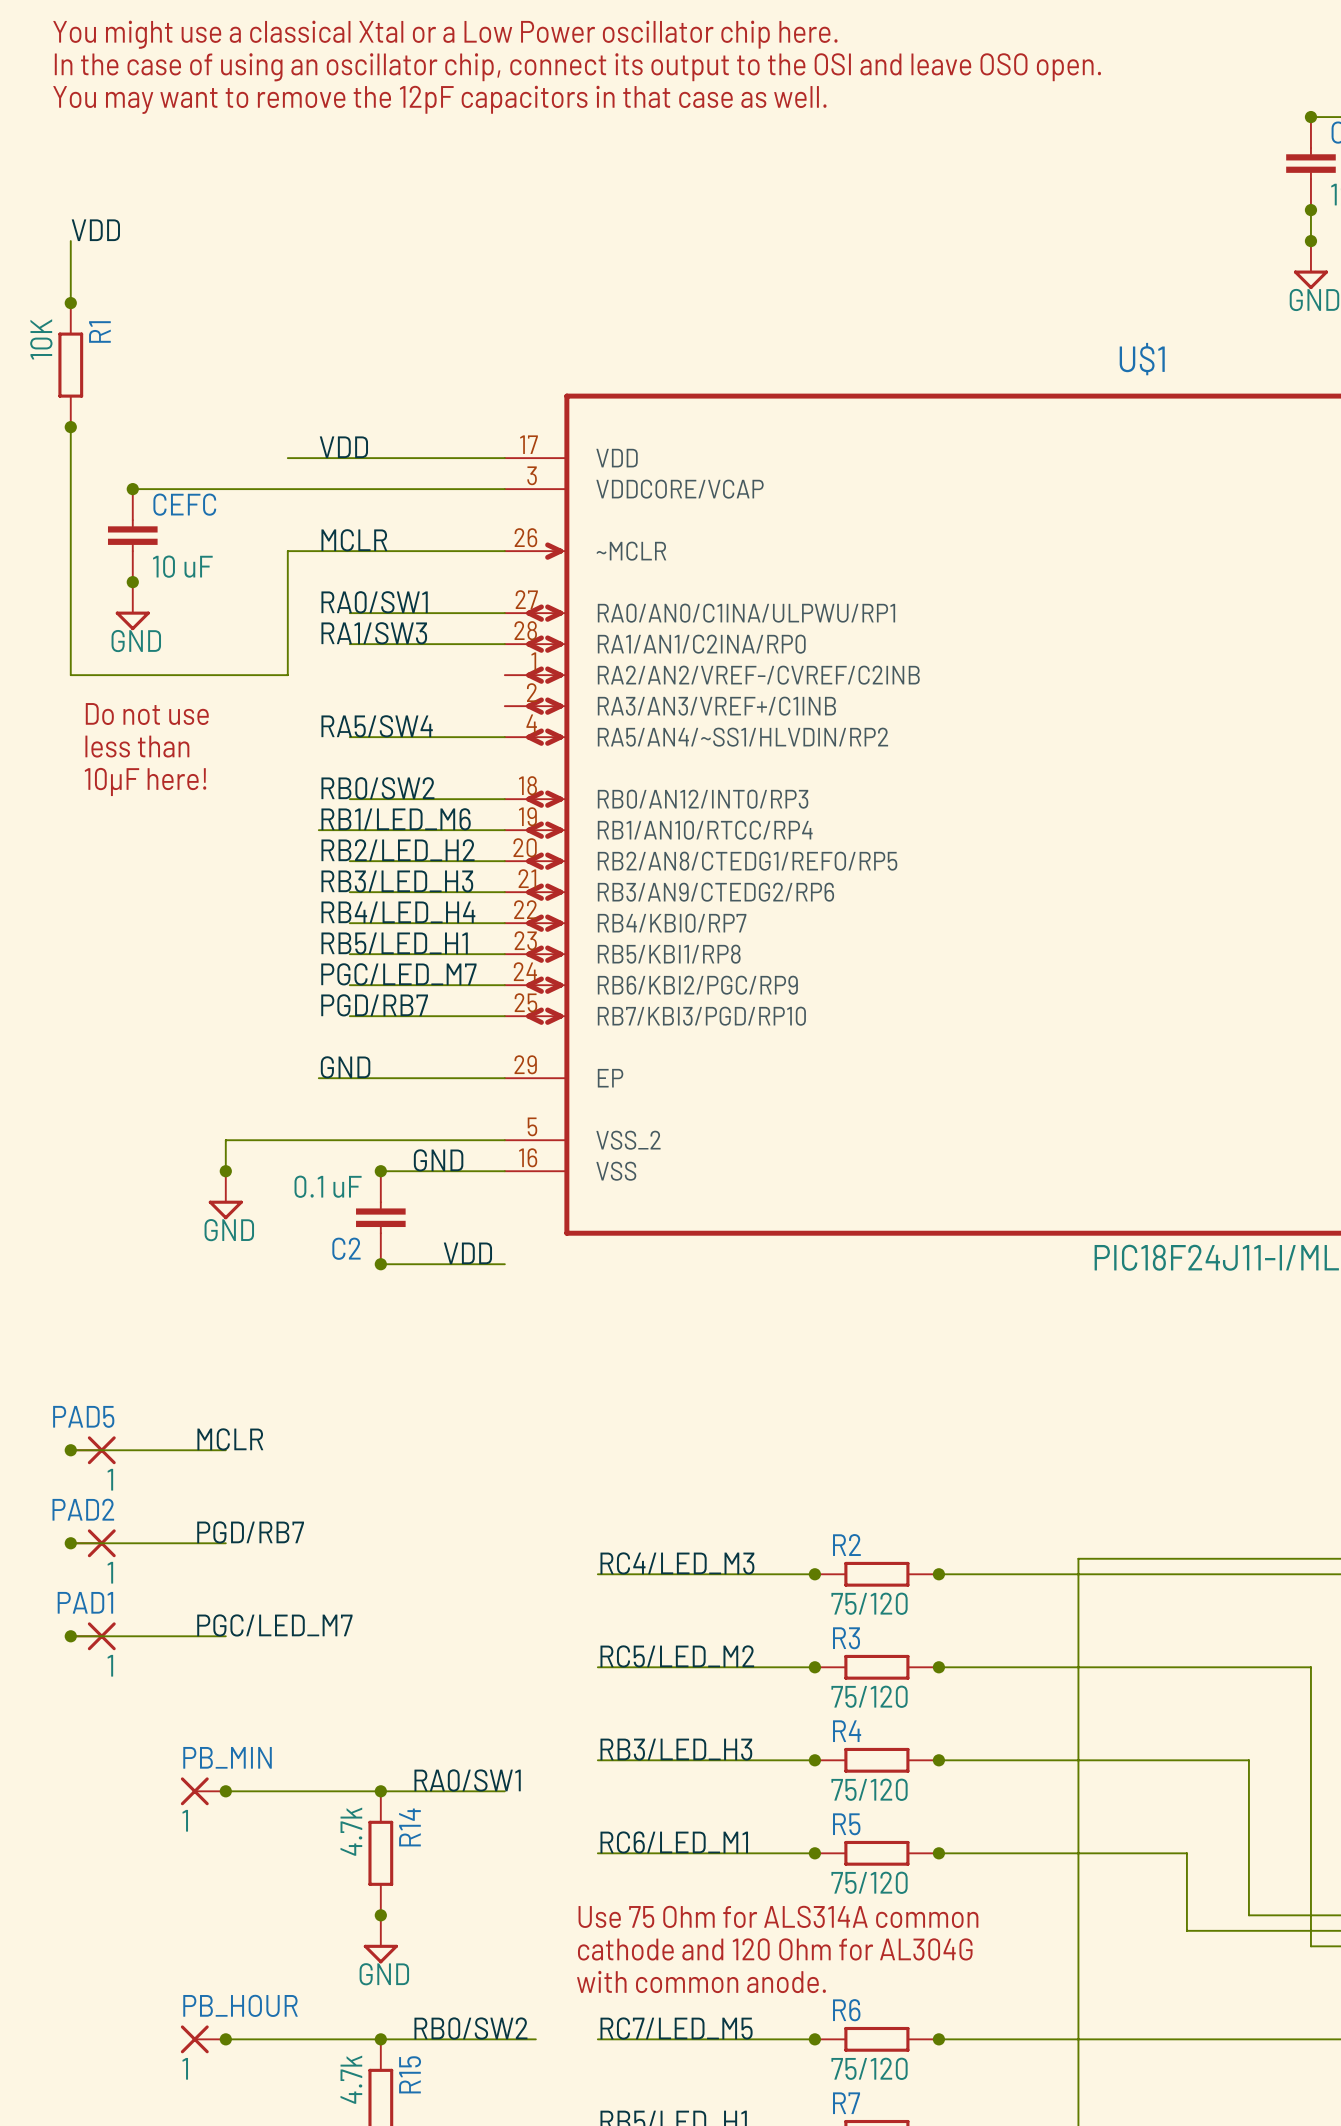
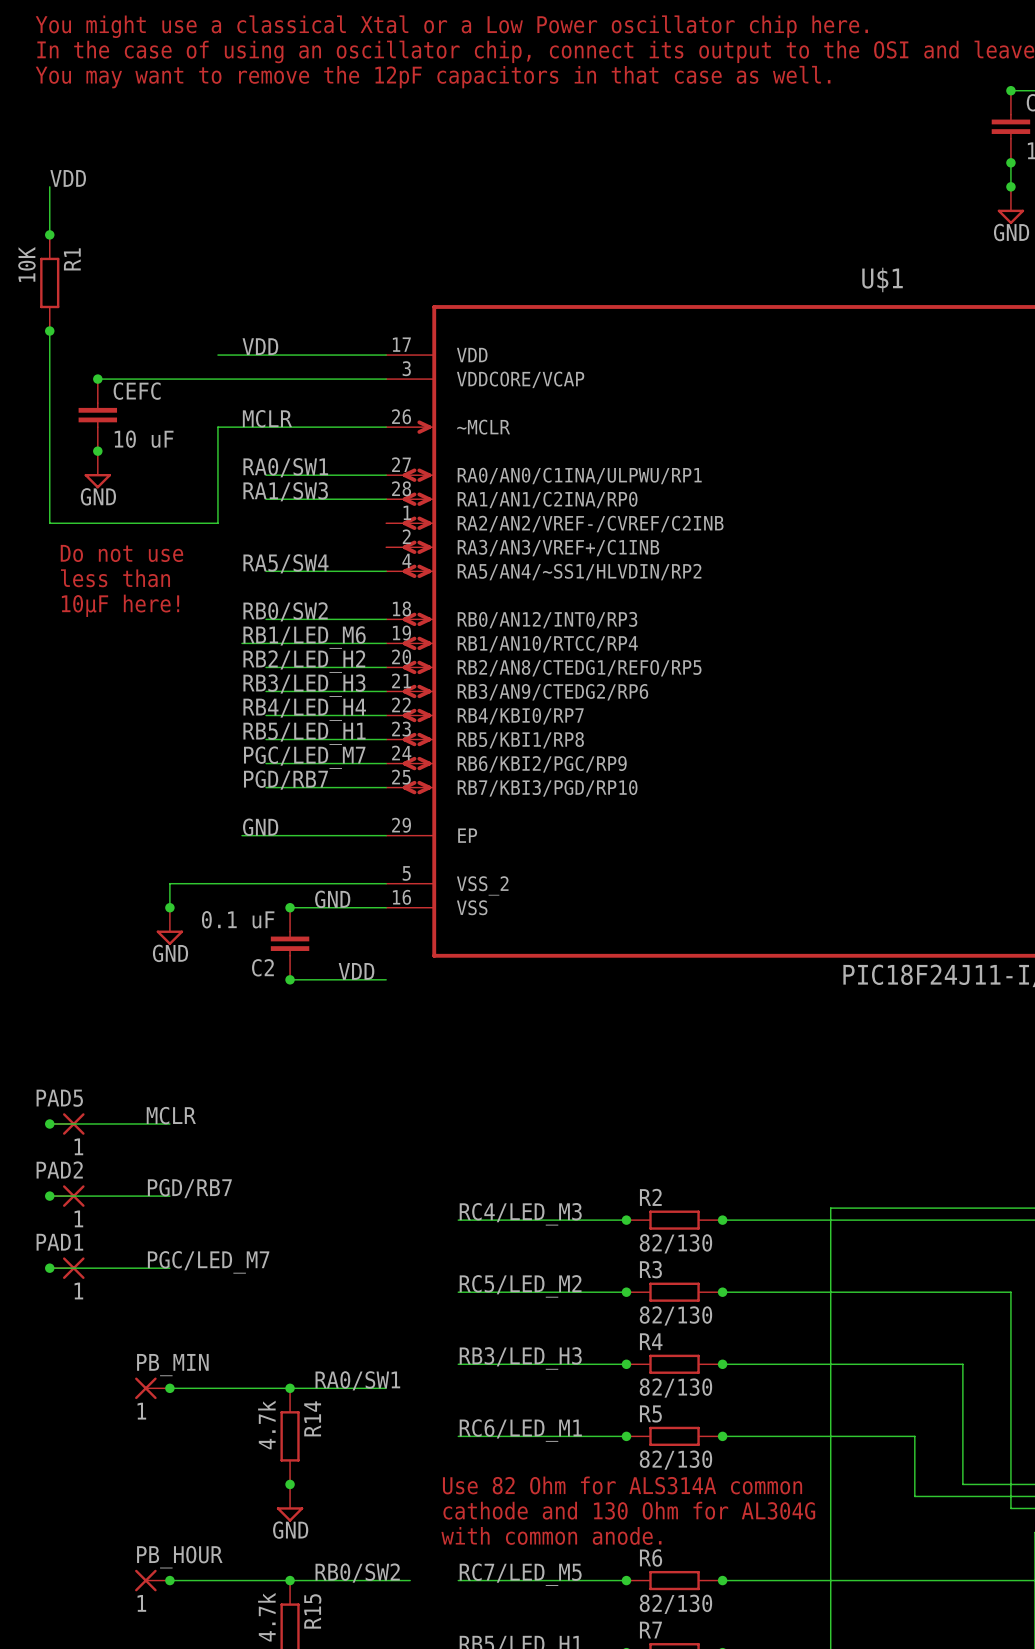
R2 value: 75/120 (869, 1603) -> 82/130 (675, 1243)
R3 value: 75/120 (869, 1696) -> 82/130 (675, 1315)
R4 value: 75/120 (869, 1789) -> 82/130 (675, 1388)
R5 value: 75/120 (869, 1882) -> 82/130 (675, 1460)
text: Use 75 Ohm for ALS314A common (778, 1916) -> Use 82 Ohm for ALS314A common (622, 1485)
text: cathode and 120 Ohm for AL304G (775, 1949) -> cathode and 130 Ohm for AL304G (629, 1510)
R6 value: 75/120 (869, 2068) -> 82/130 (675, 1604)

